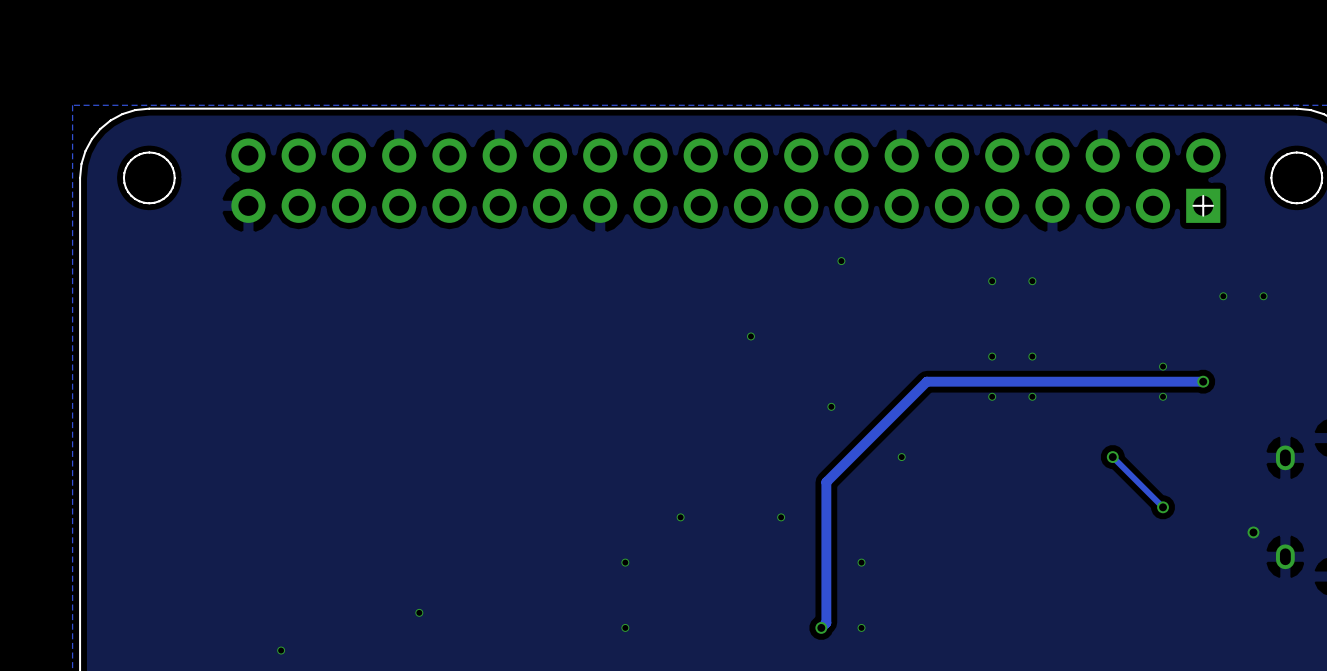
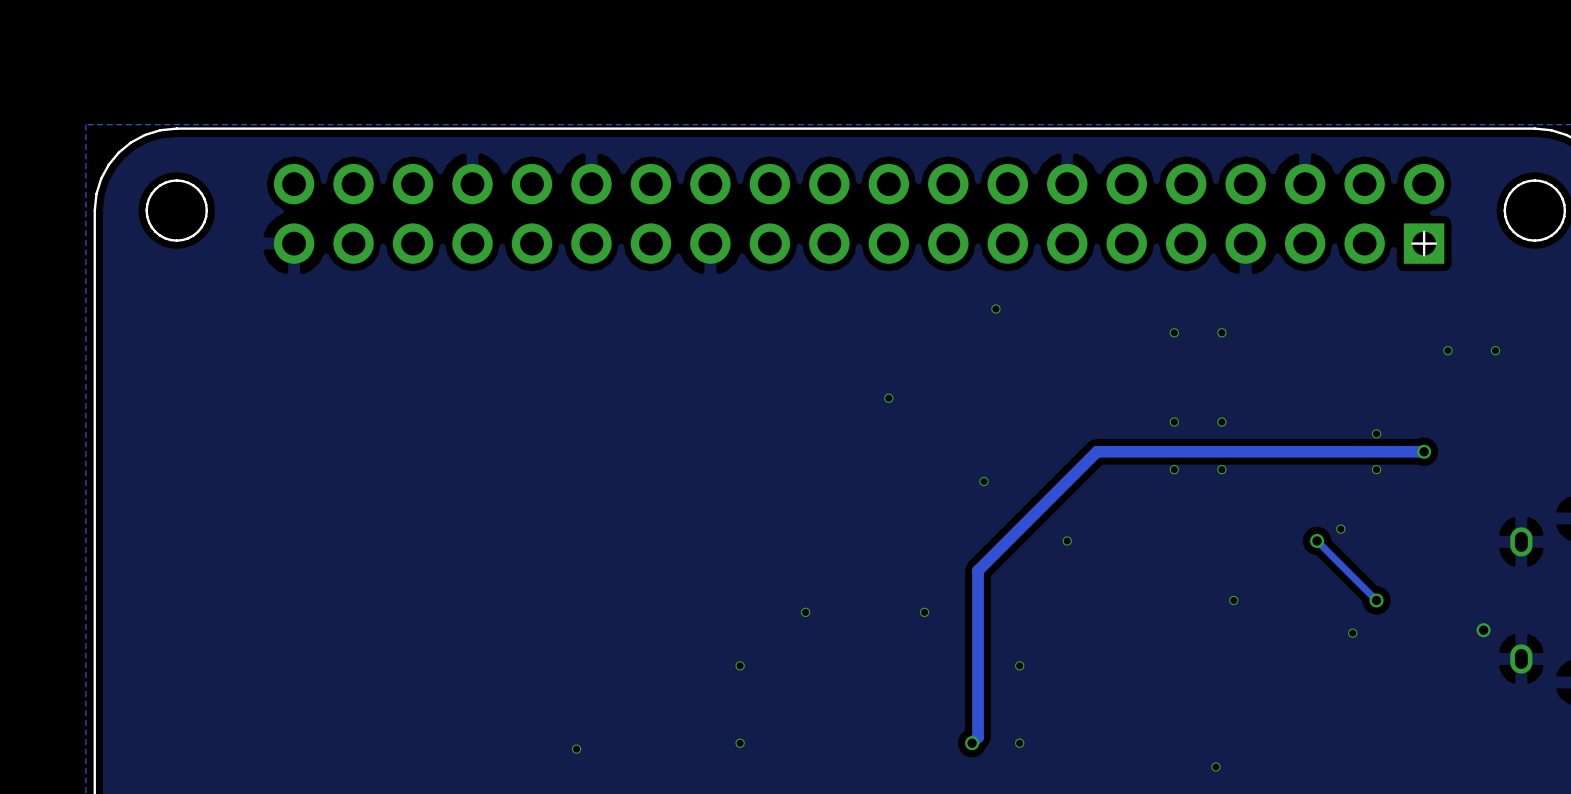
part: none -> (1340, 529)
part: none -> (1233, 600)
part: none -> (1352, 633)
part: (419, 612) -> none
part: none -> (576, 749)
part: none -> (1215, 766)
part: (281, 650) -> none

